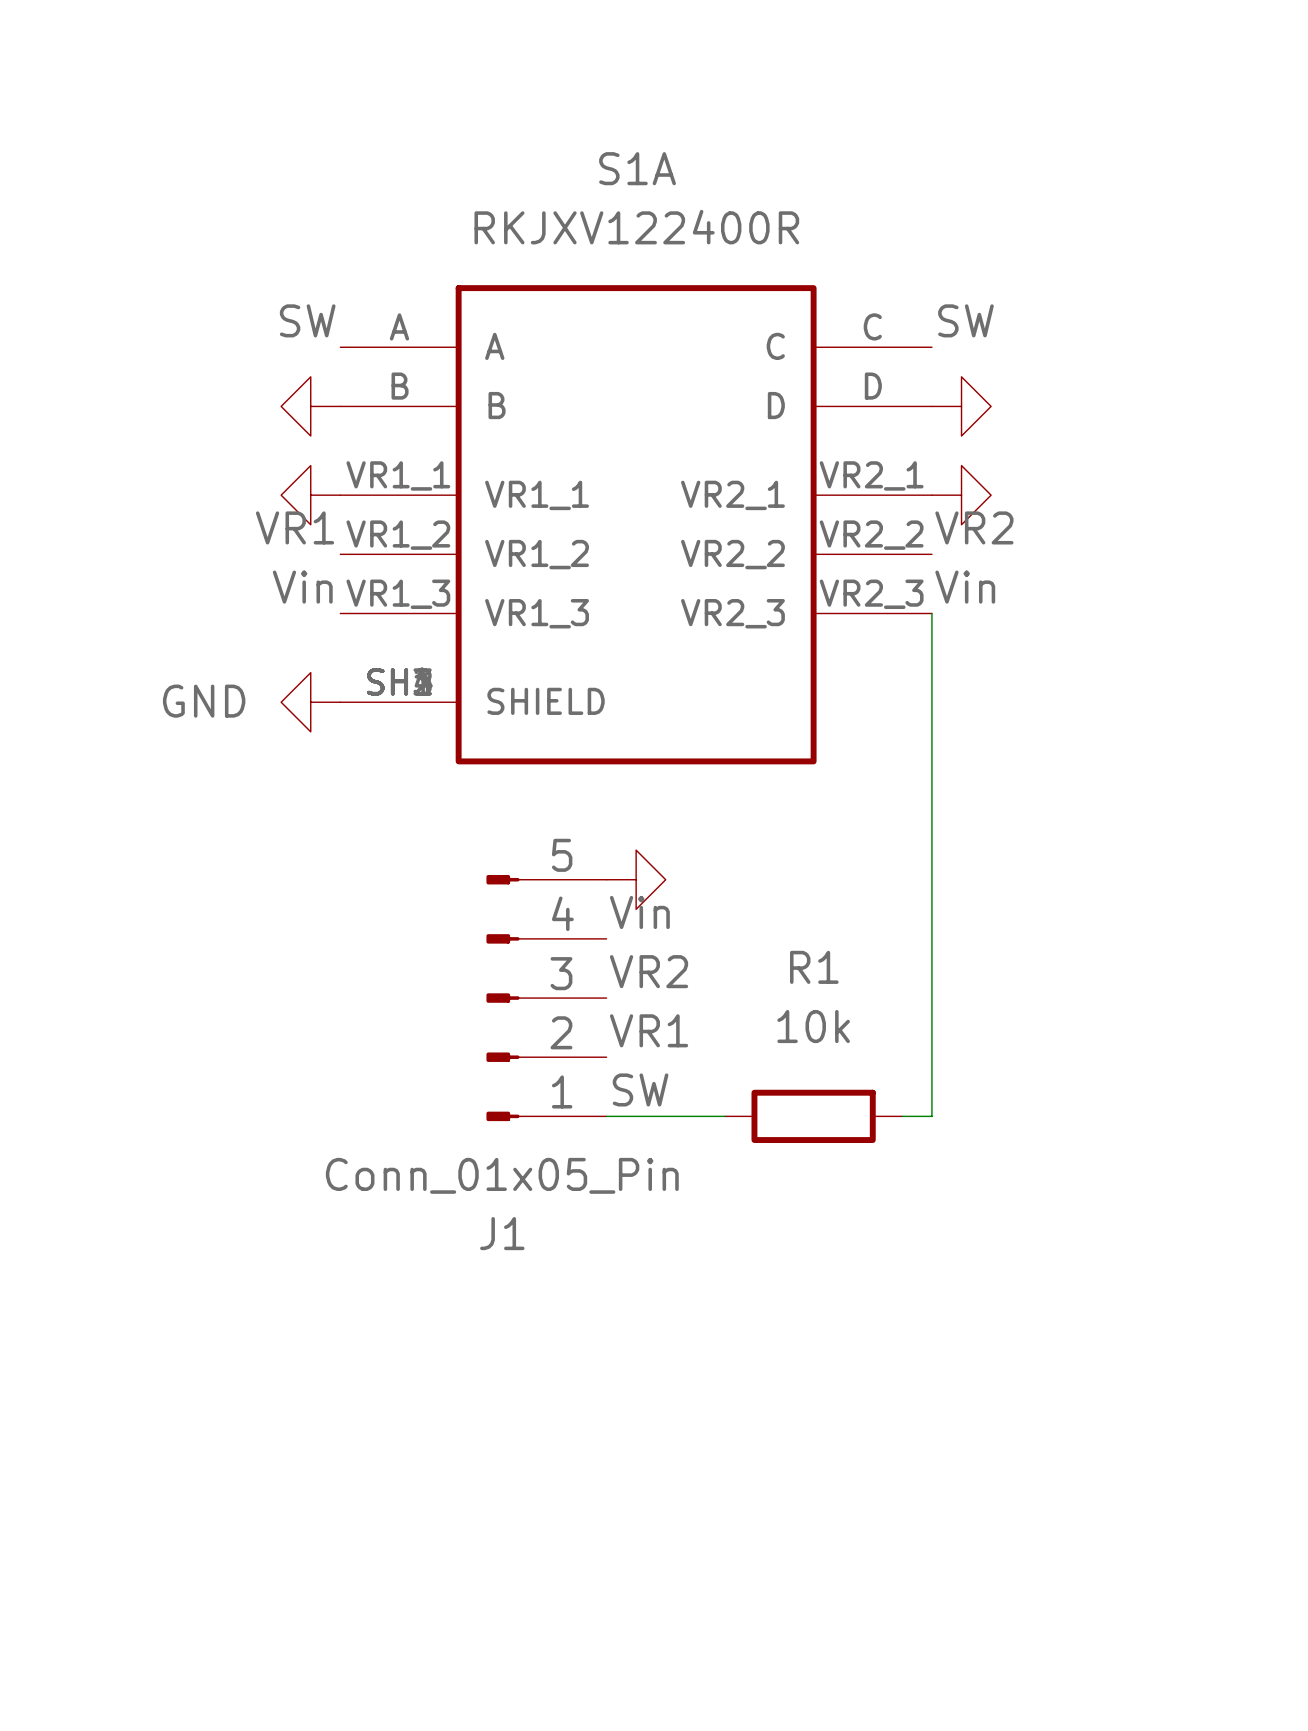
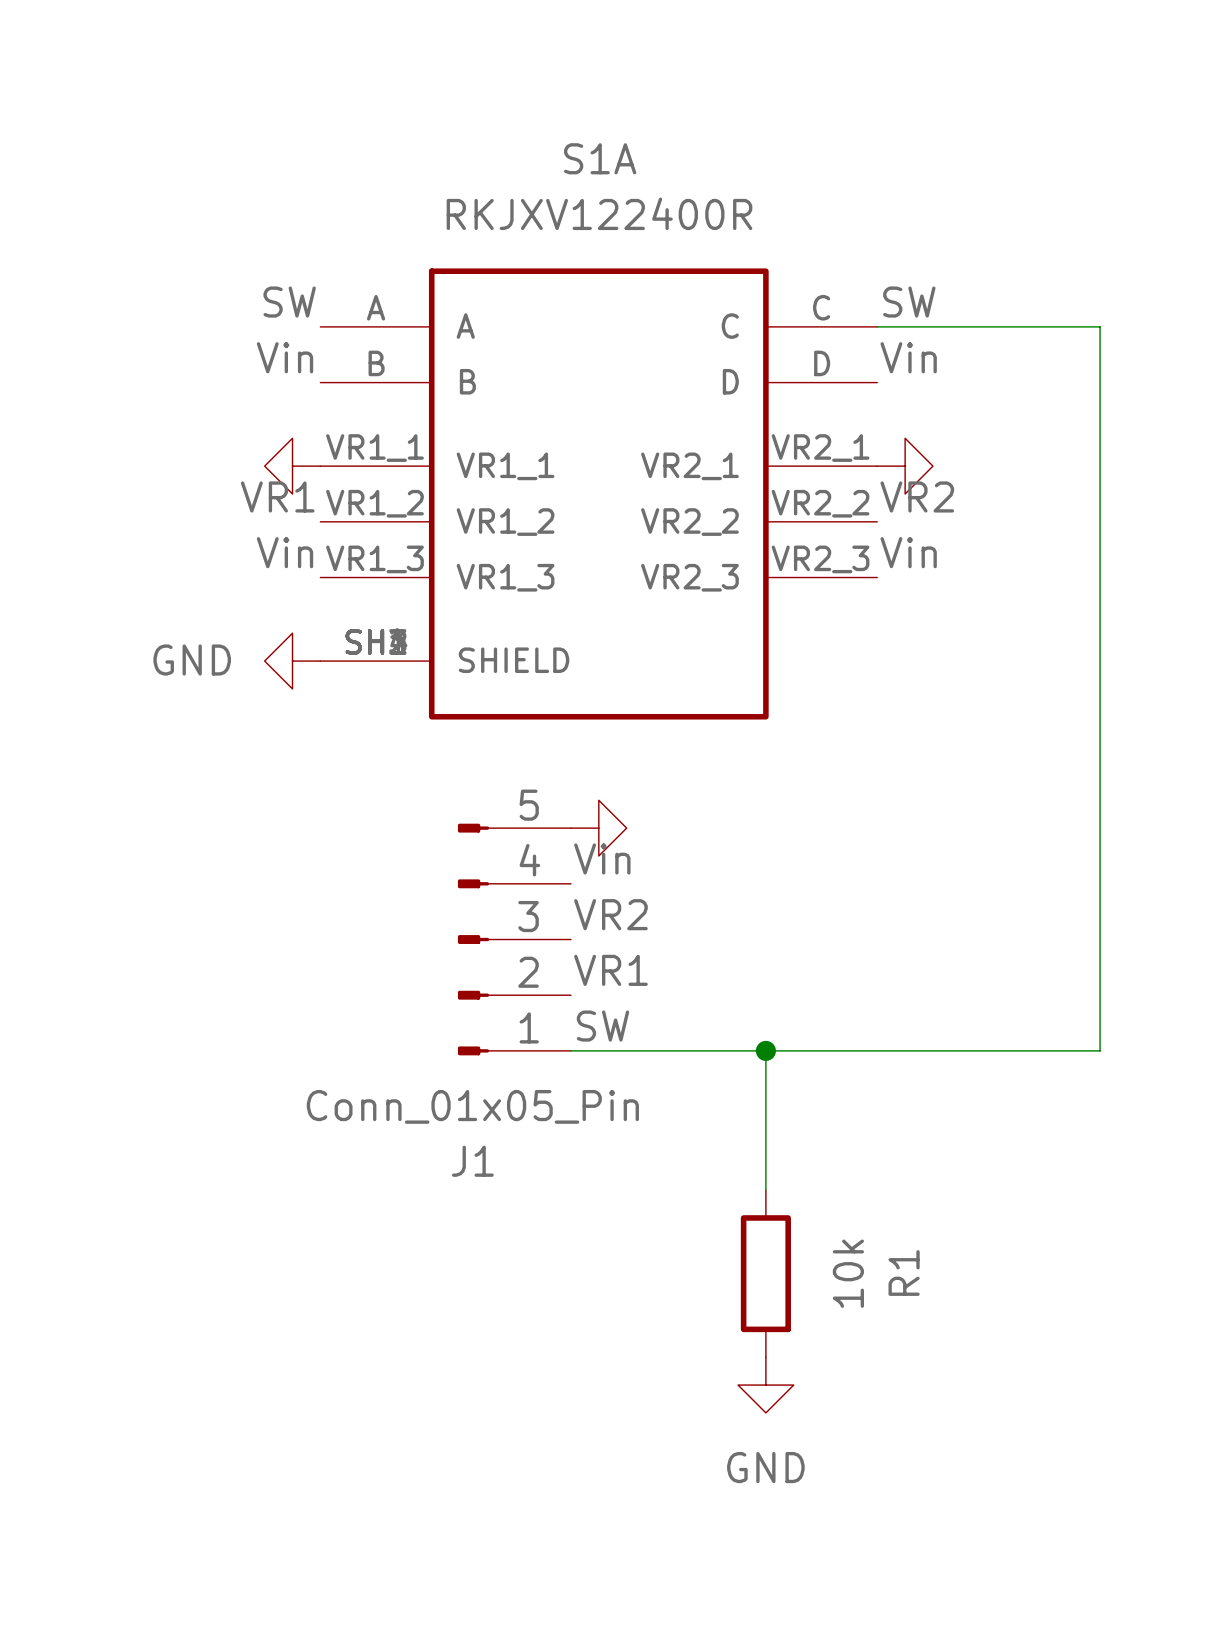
label: none -> Vin (285, 357)
label: none -> Vin (908, 357)
power symbol: (310, 406) -> none
power symbol: (961, 406) -> none
wire: (931, 613) (931, 1116) -> (877, 326) (1100, 326) (1100, 1050) (877, 1050)
wire: none -> (682, 1050) (849, 1050)
wire: none -> (765, 1050) (765, 1190)
R1 rotation: 0° (813, 1116) -> 90° clockwise (765, 1273)
R1 position: (813, 1116) -> (765, 1273)
junction: none -> (765, 1050)
power symbol: none -> GND (765, 1385)

